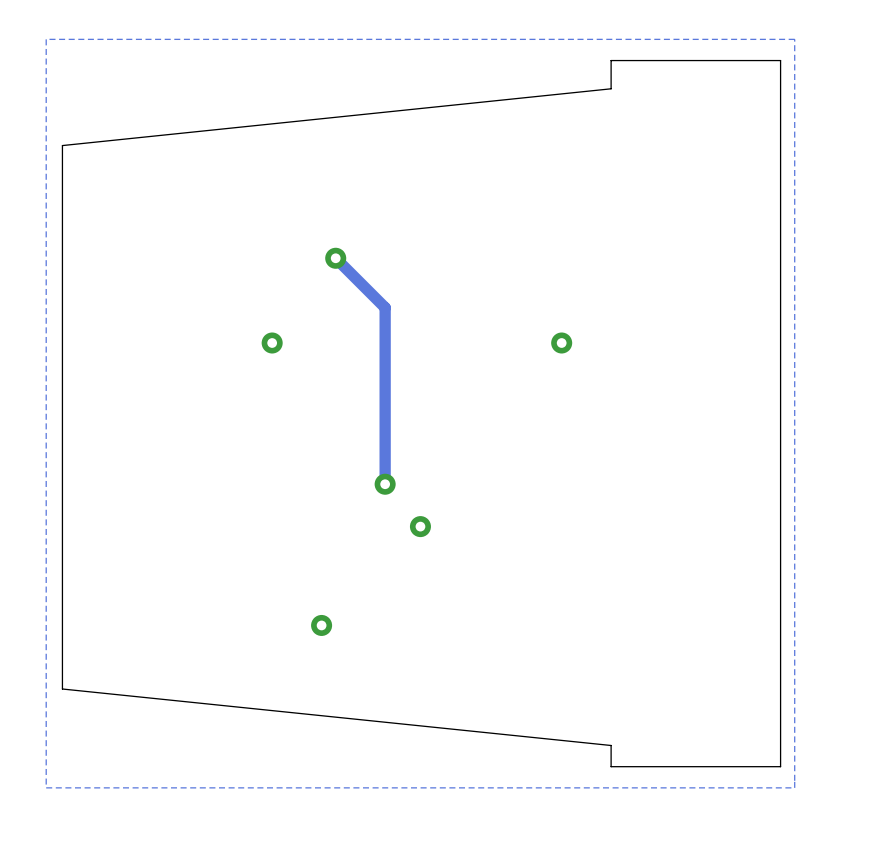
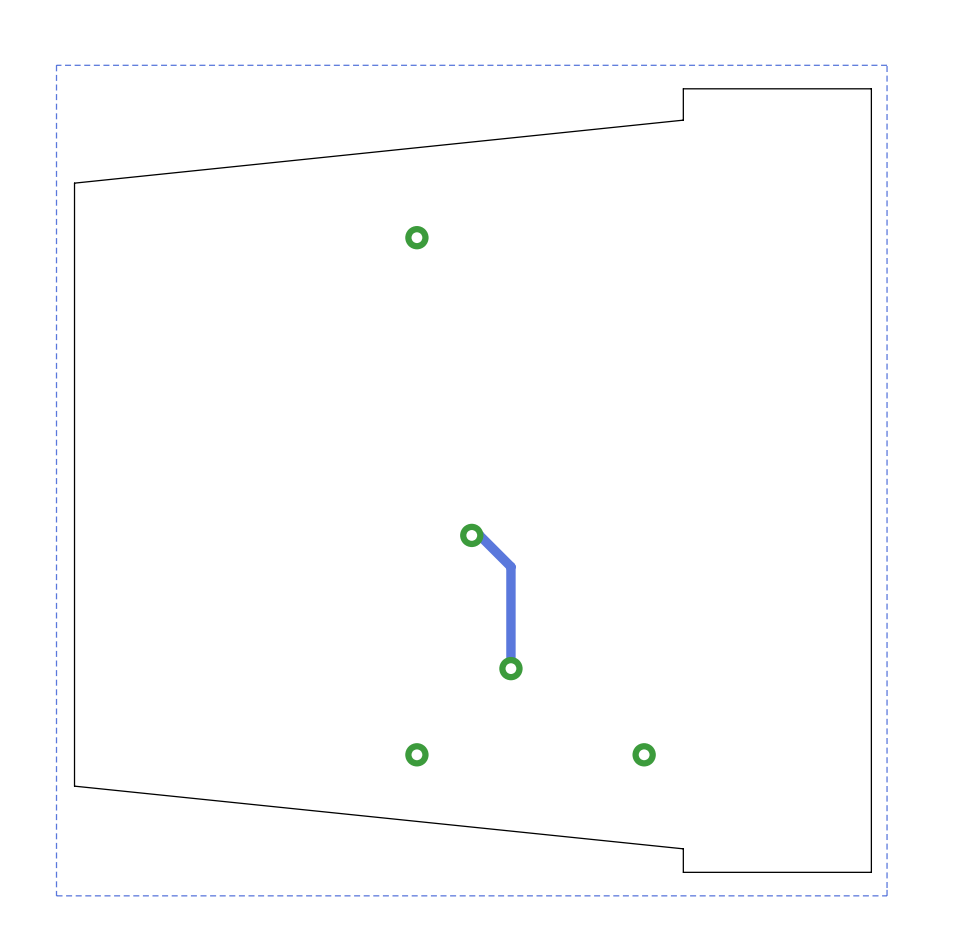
track: (335, 258) (385, 307) (385, 484) -> none
via position: (335, 258) -> (416, 237)
via: (272, 343) -> none
via: (561, 343) -> none
track: none -> (471, 535) (479, 535) (510, 566) (510, 668)
via: none -> (471, 535)
via: (385, 484) -> none
via: (420, 526) -> none
via: none -> (510, 668)
via position: (321, 625) -> (416, 754)
via: none -> (644, 754)

